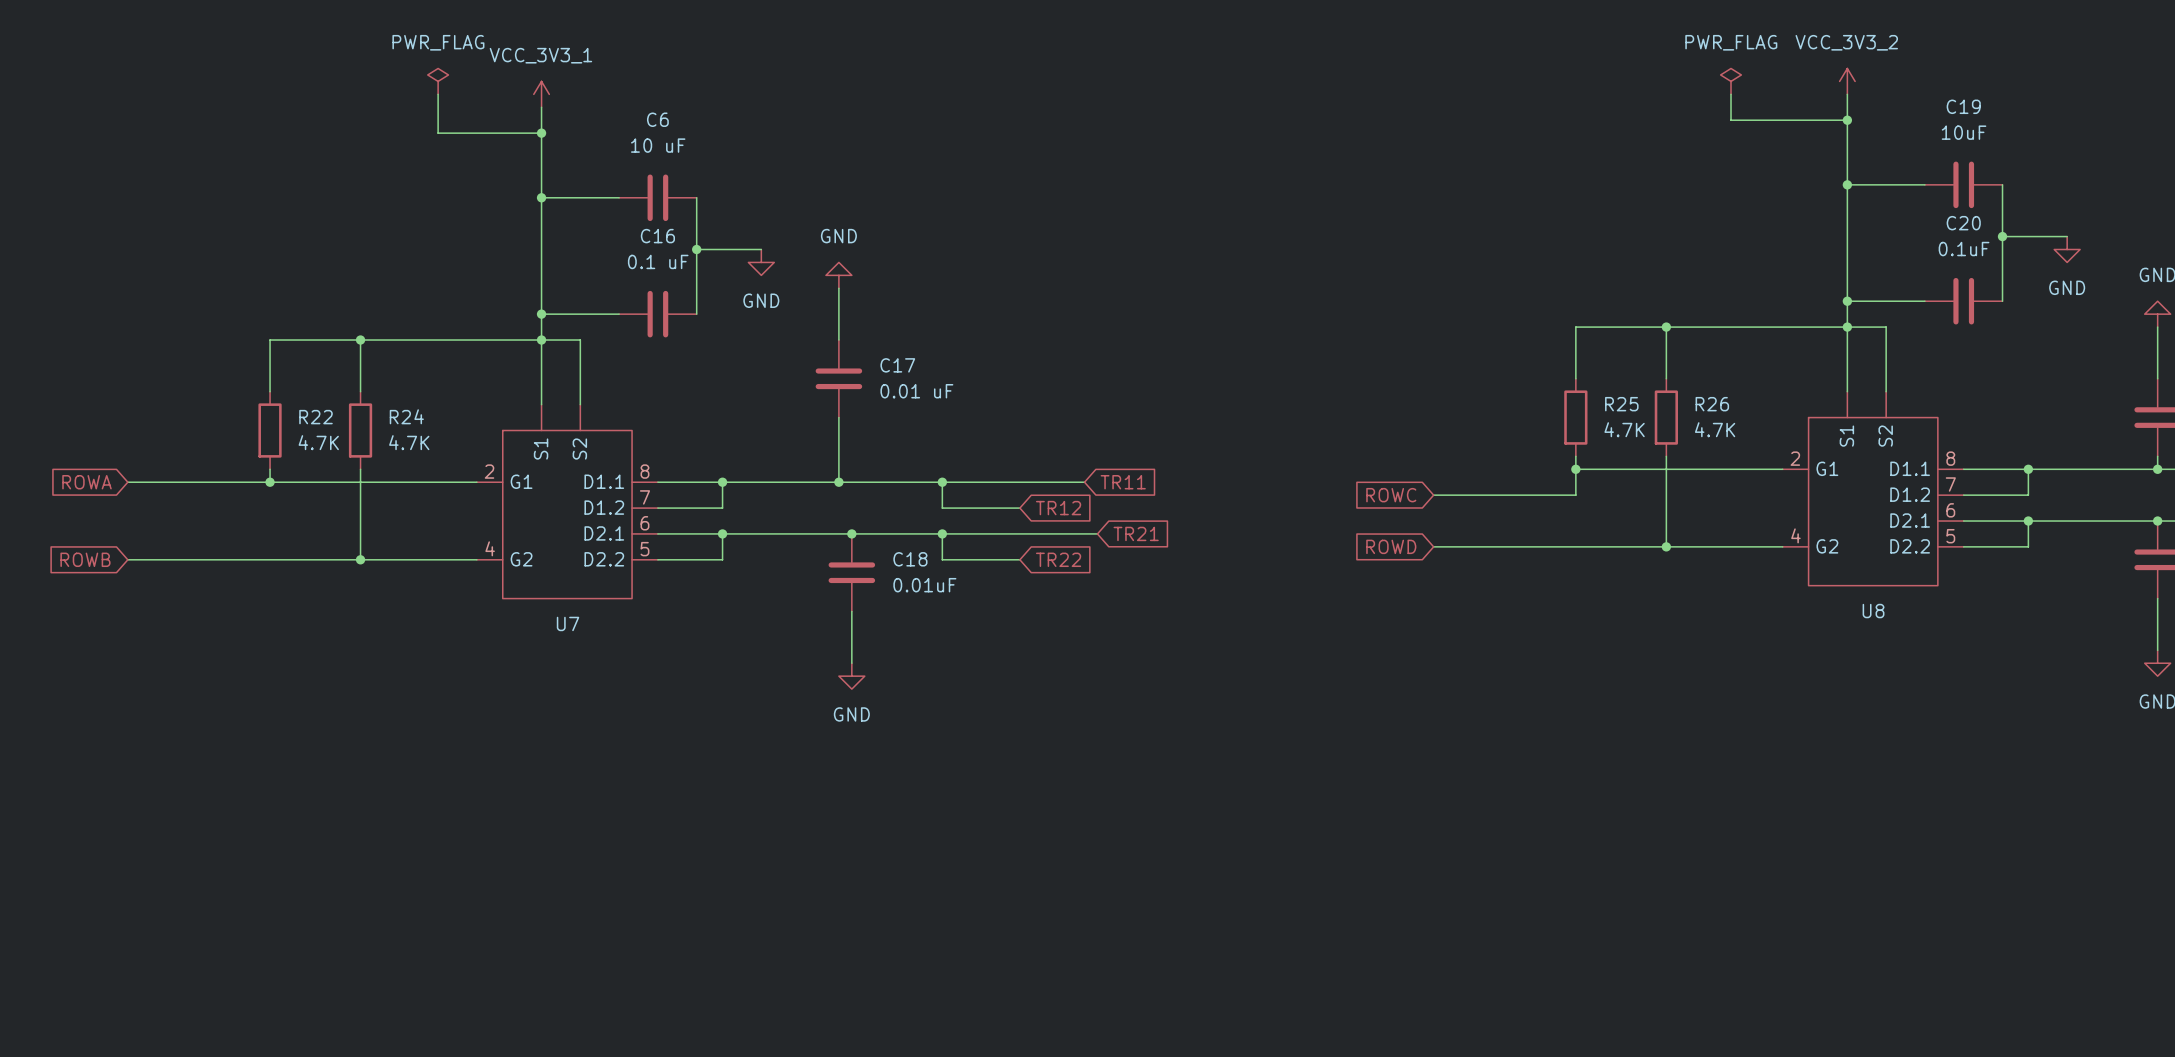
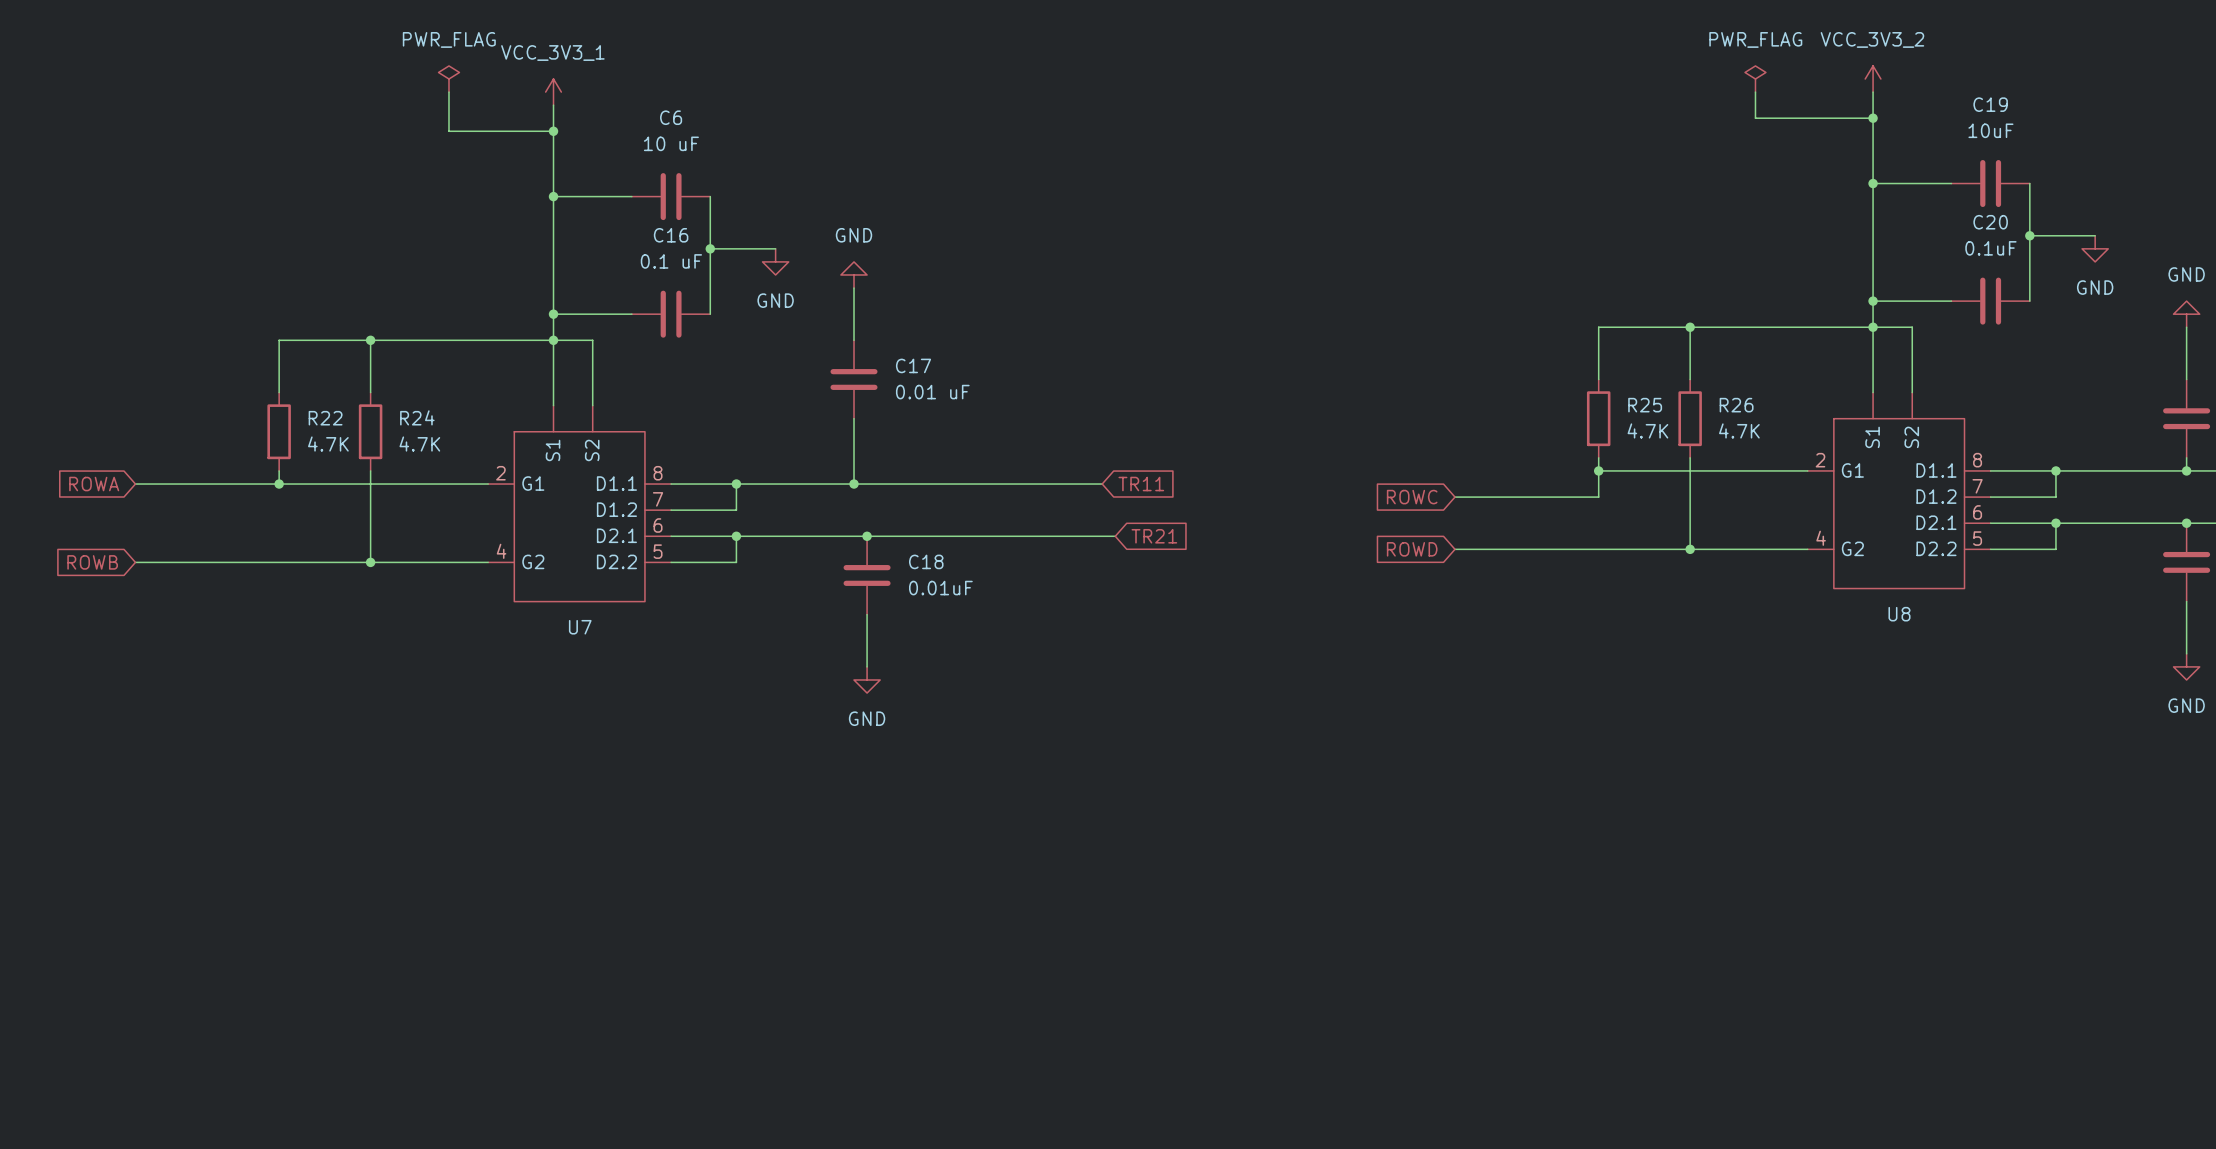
wire: (942, 482) (942, 508) (1019, 508) -> none
junction: (942, 482) -> none
global label: TR12 (1058, 508) -> none
wire: (942, 533) (942, 559) (1019, 559) -> none
junction: (942, 533) -> none
global label: TR22 (1058, 559) -> none

